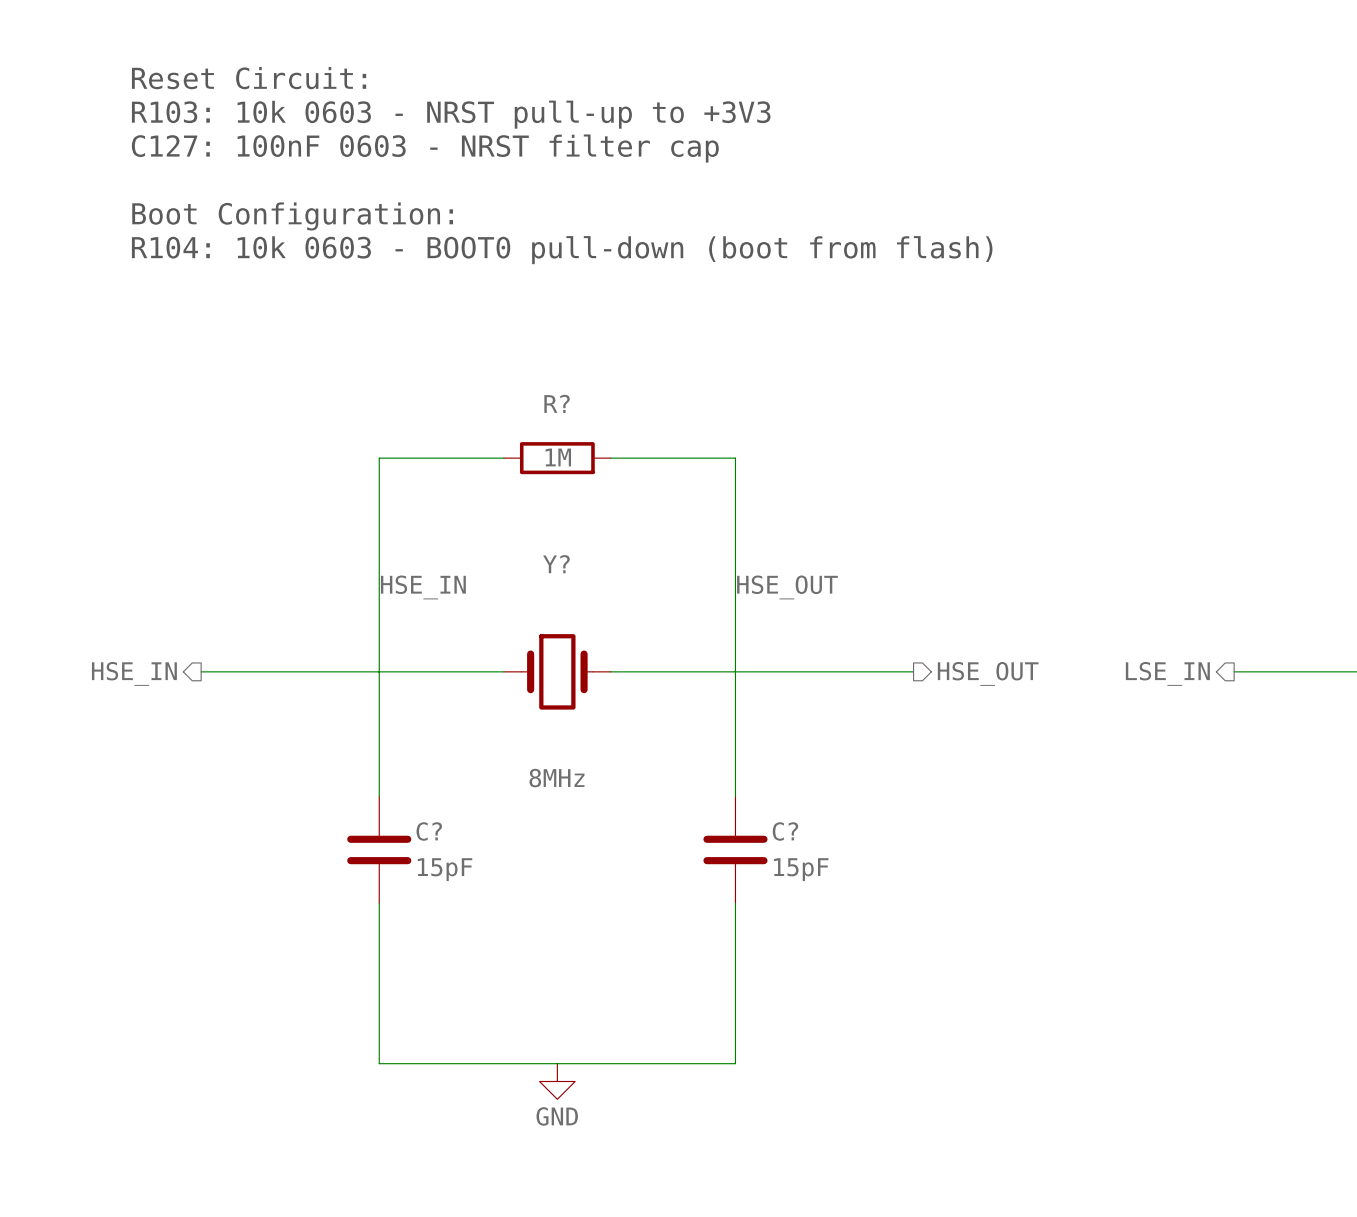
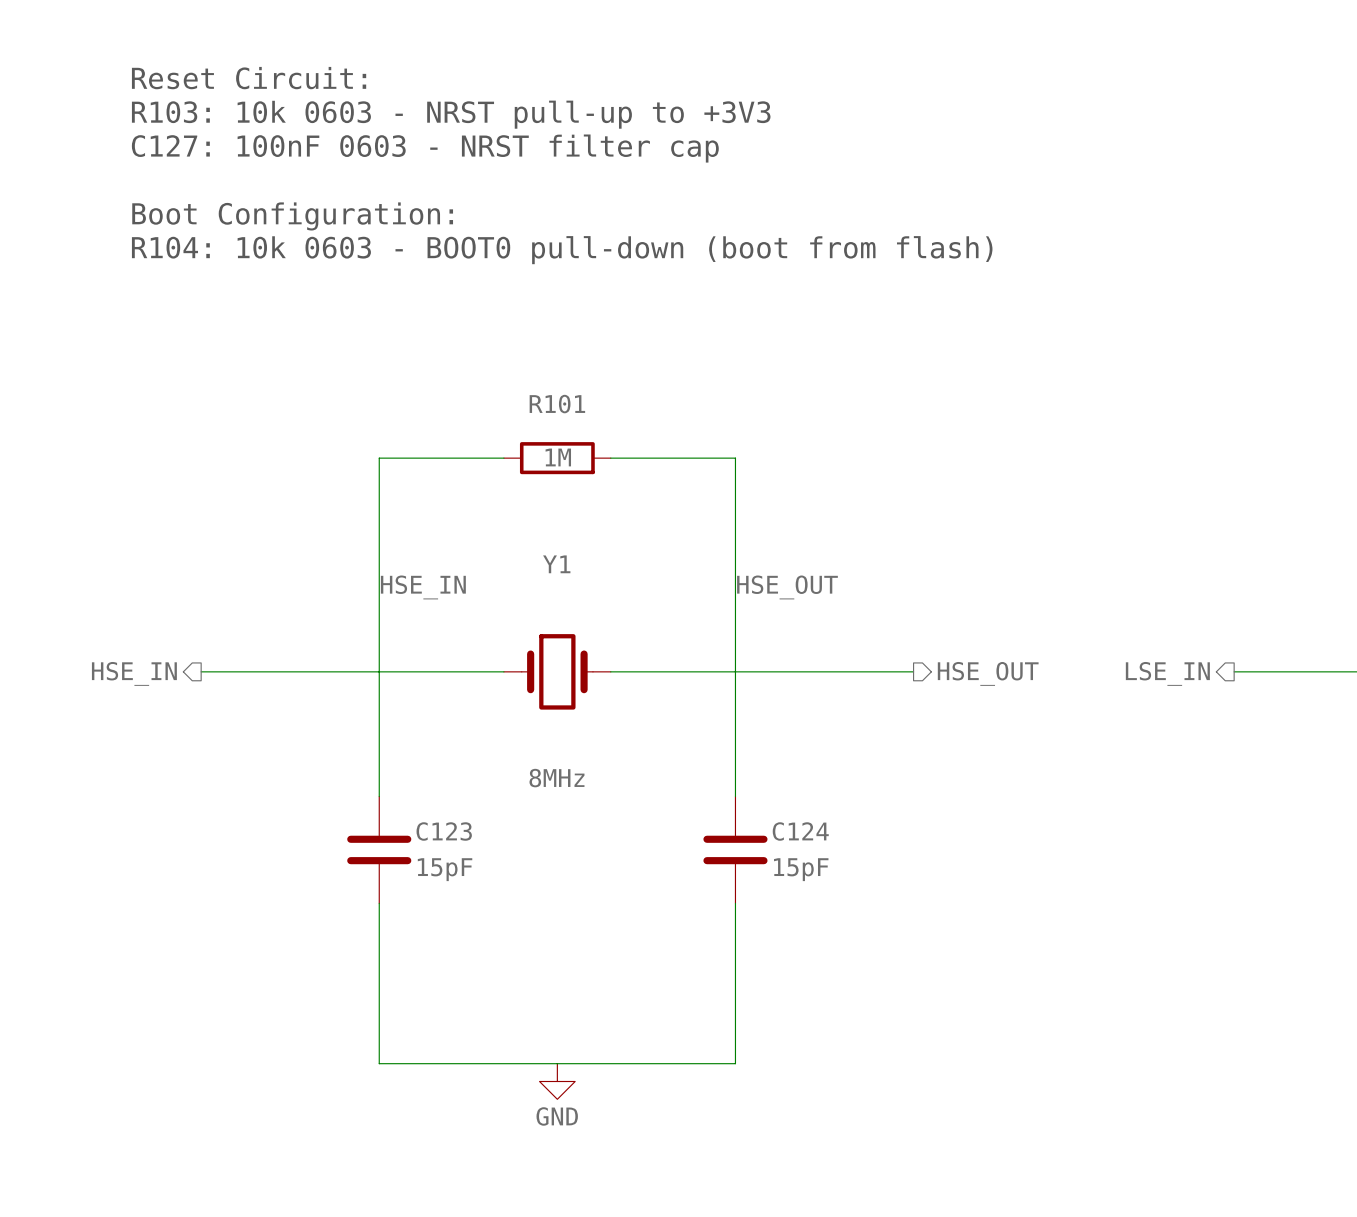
R? name: R? (557, 403) -> R101 (557, 404)
Y? name: Y? (556, 564) -> Y1 (556, 564)
C? name: C? (429, 831) -> C123 (444, 831)
C? name: C? (785, 831) -> C124 (800, 831)

